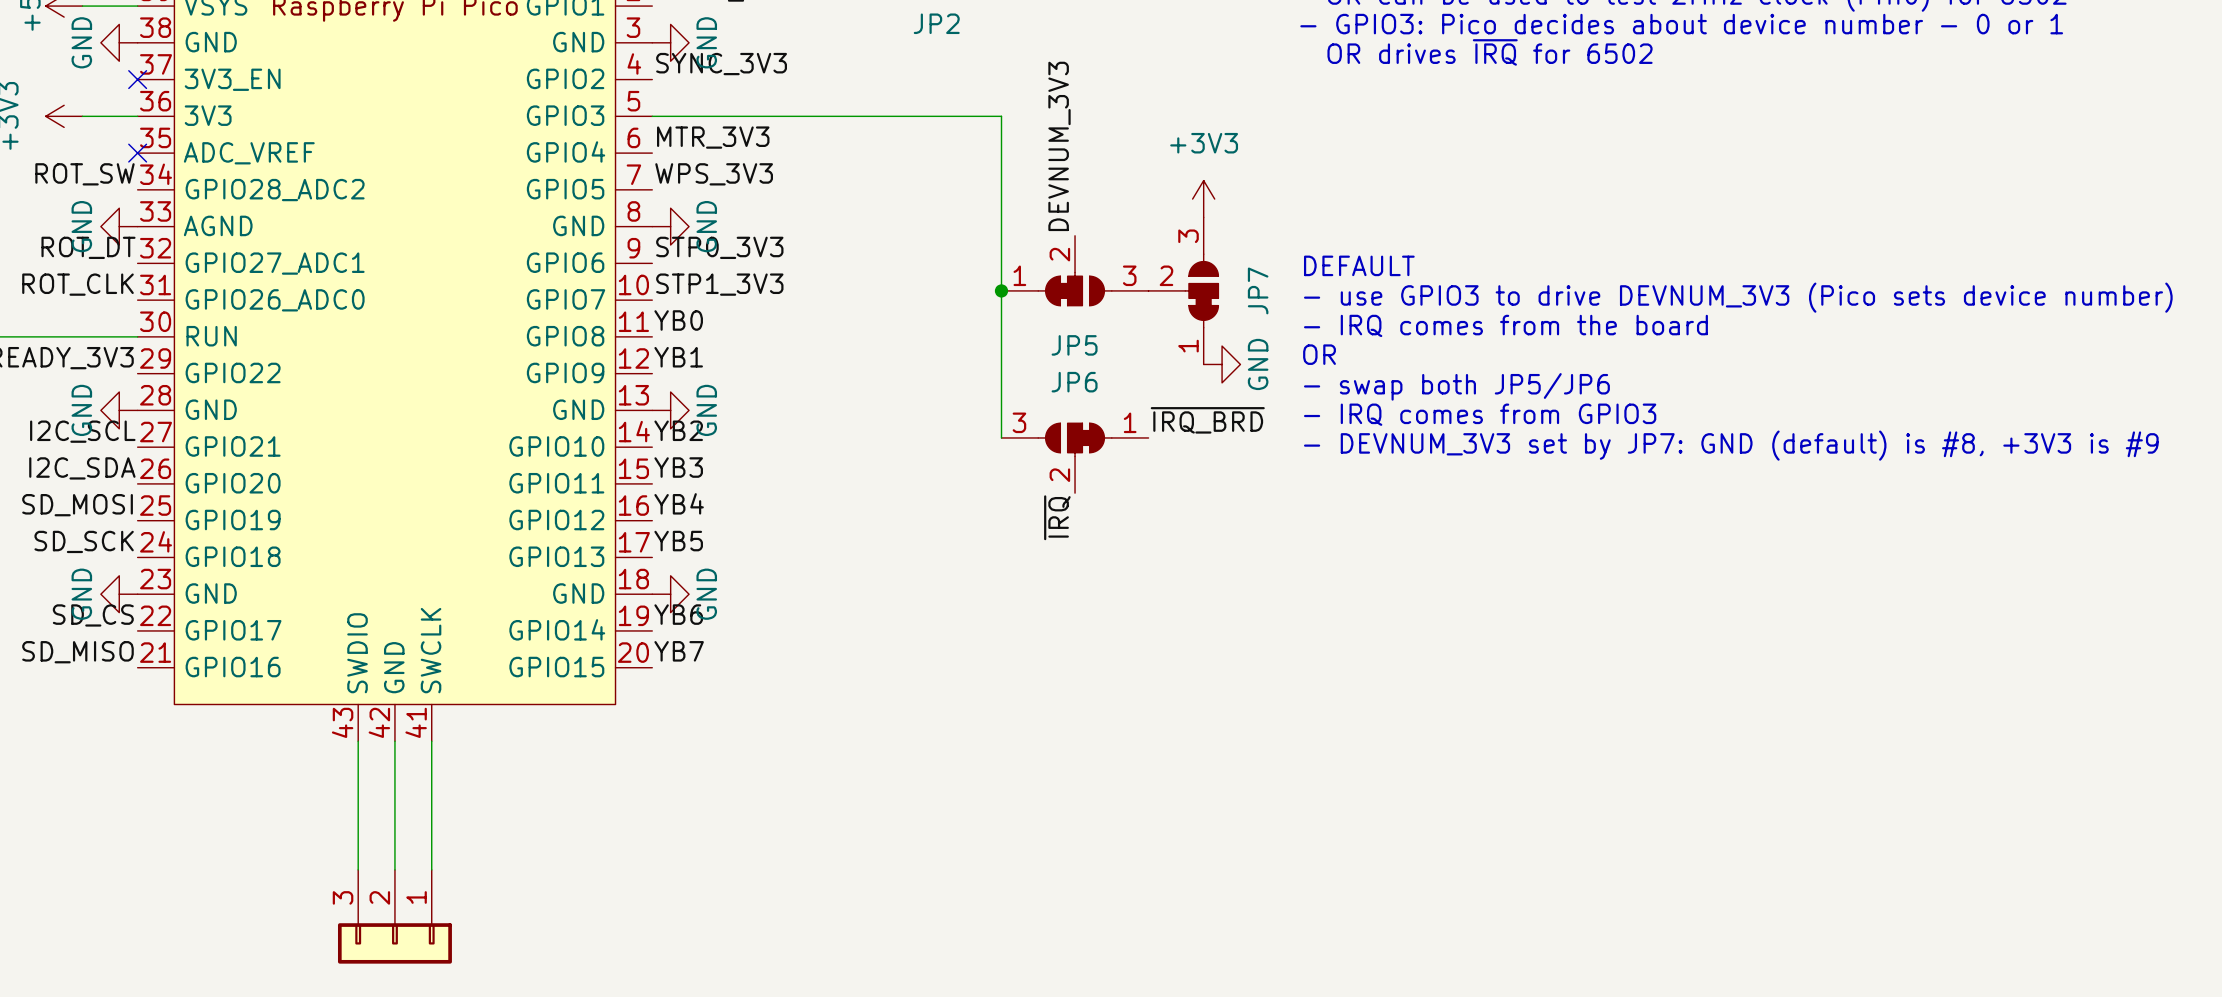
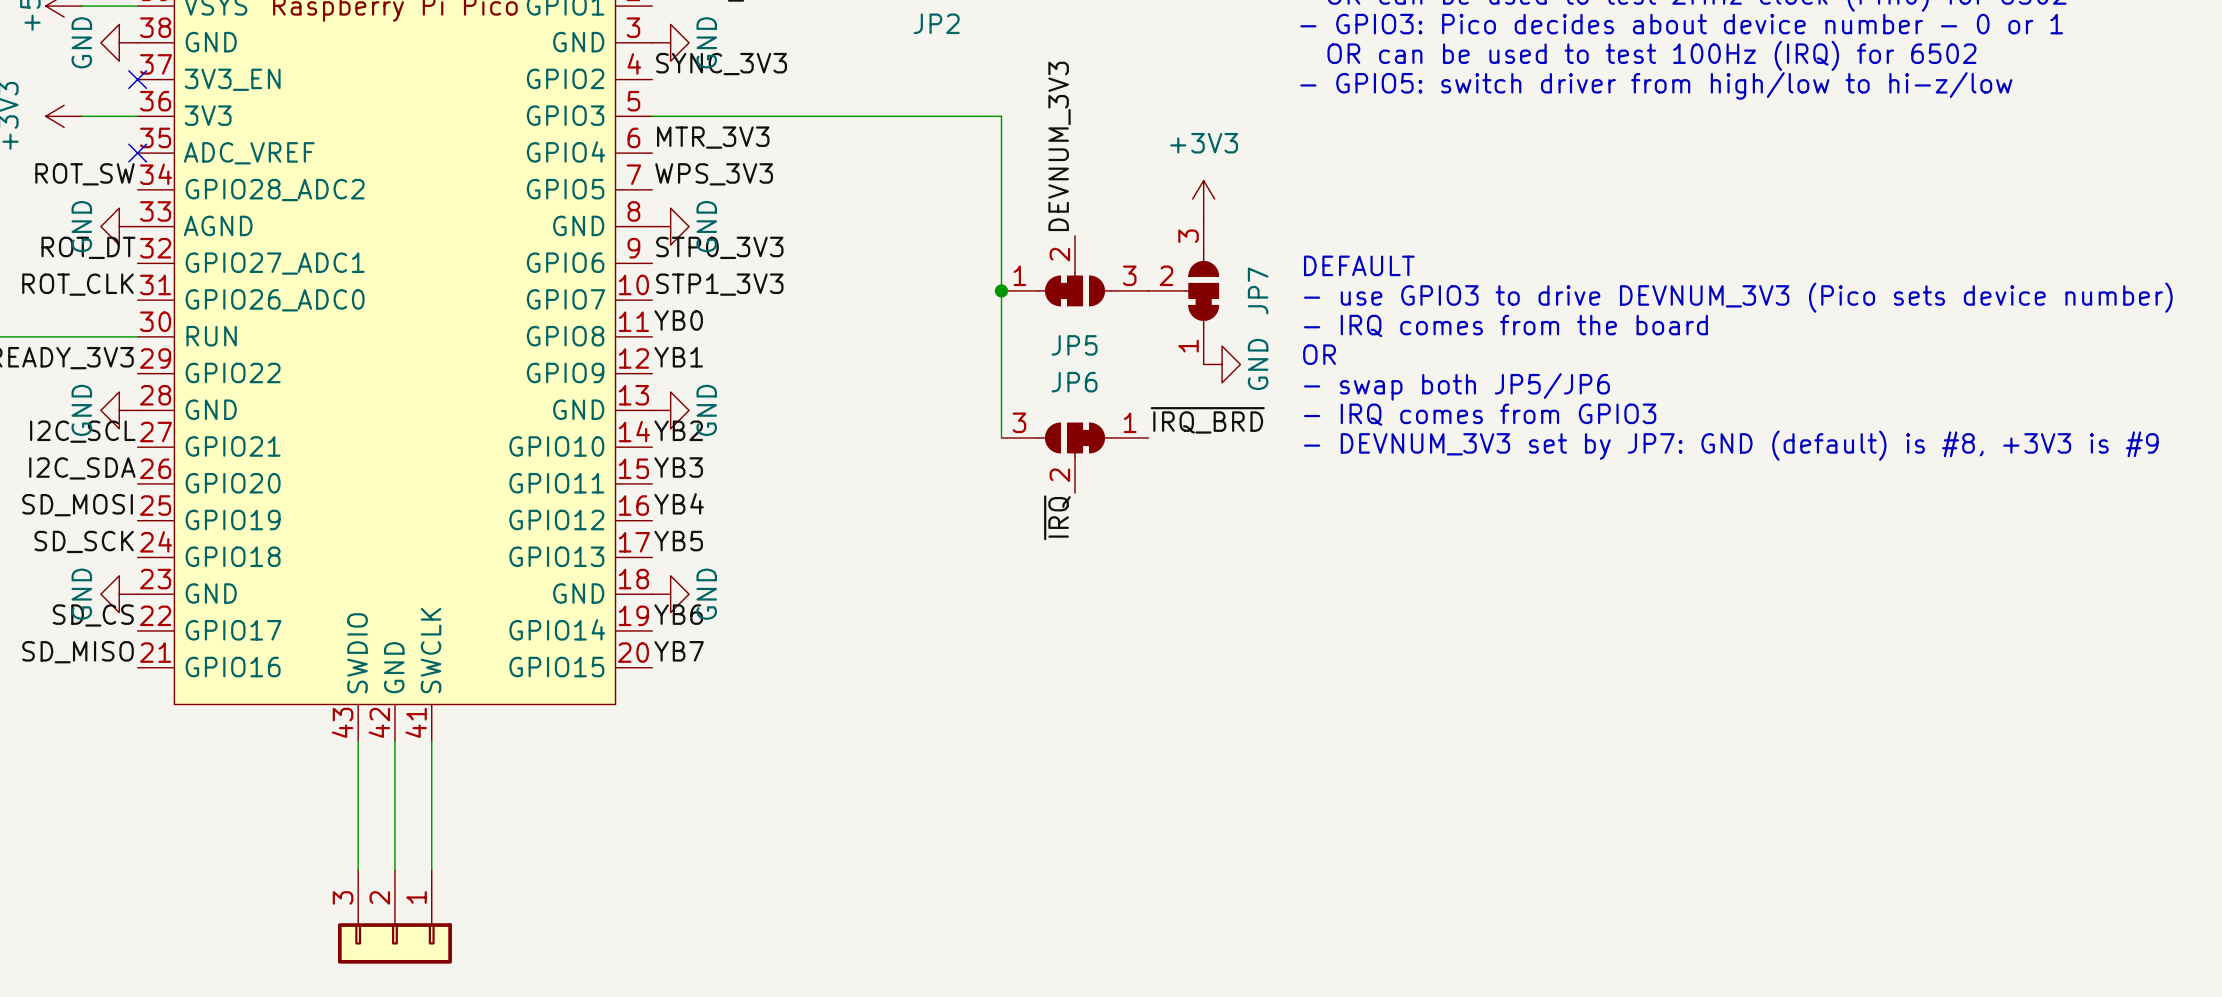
text: OR drives ~{IRQ} for 6502 (1490, 52) -> OR can be used to test 100Hz (IRQ) for 6502 (1651, 55)
text: none -> - GPIO5: switch driver from high/low to hi-z/low (1656, 85)

